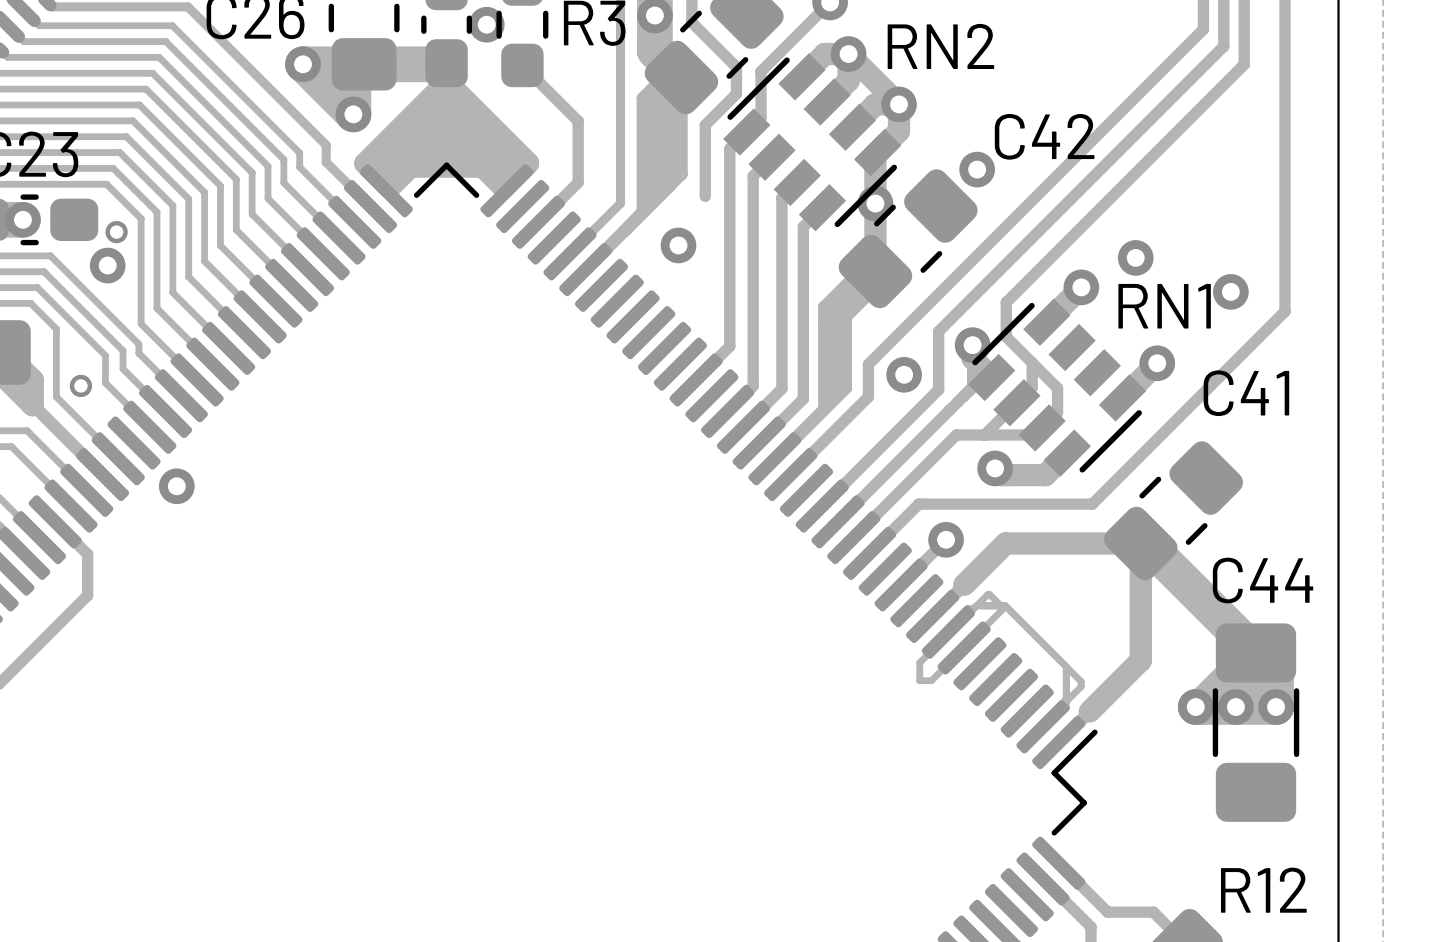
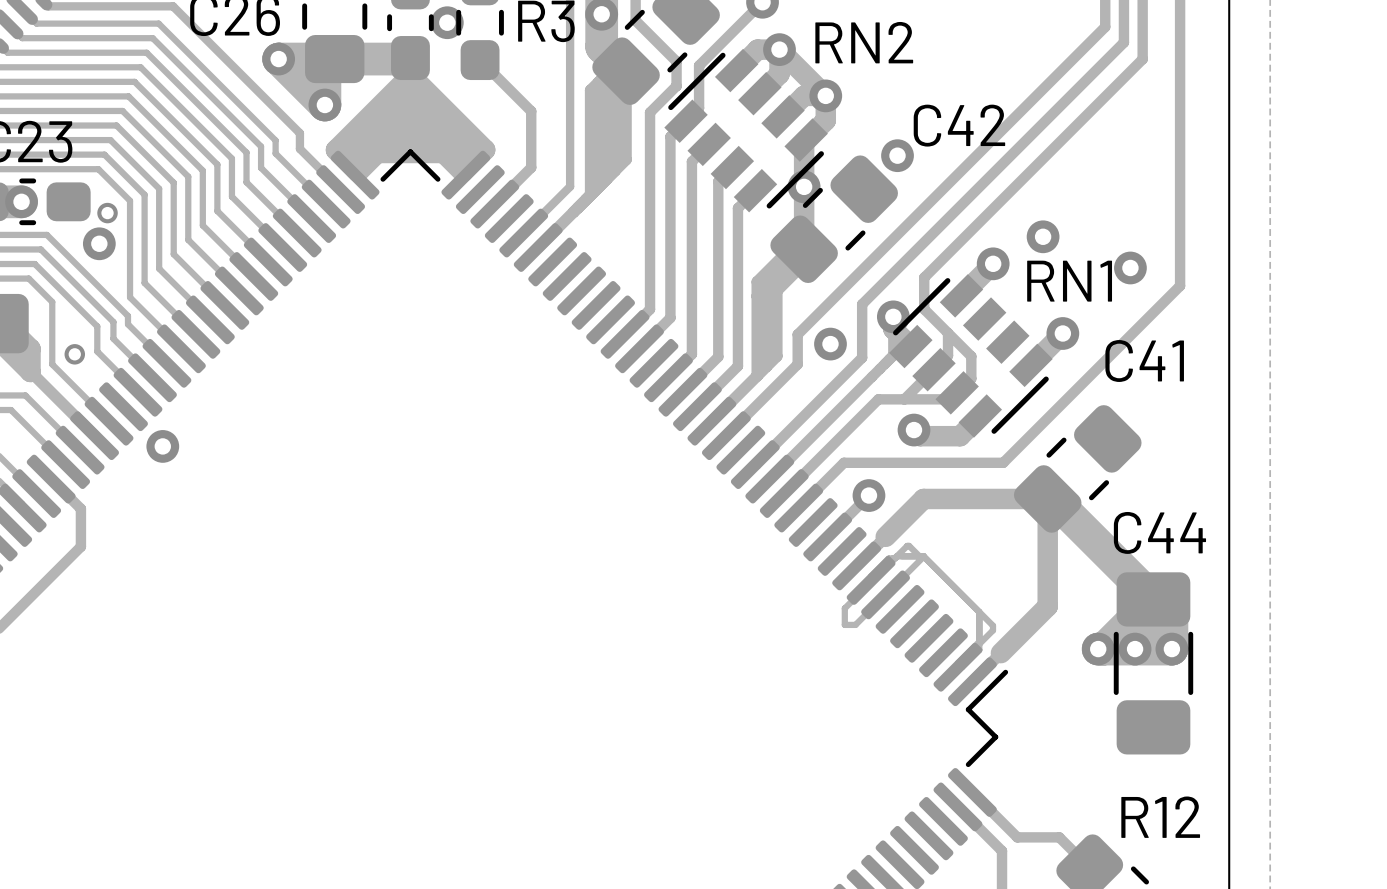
track: (736, 93) (705, 125) (705, 196) -> (676, 86) (650, 112) (650, 309) (625, 334)
via: (678, 245) -> none

